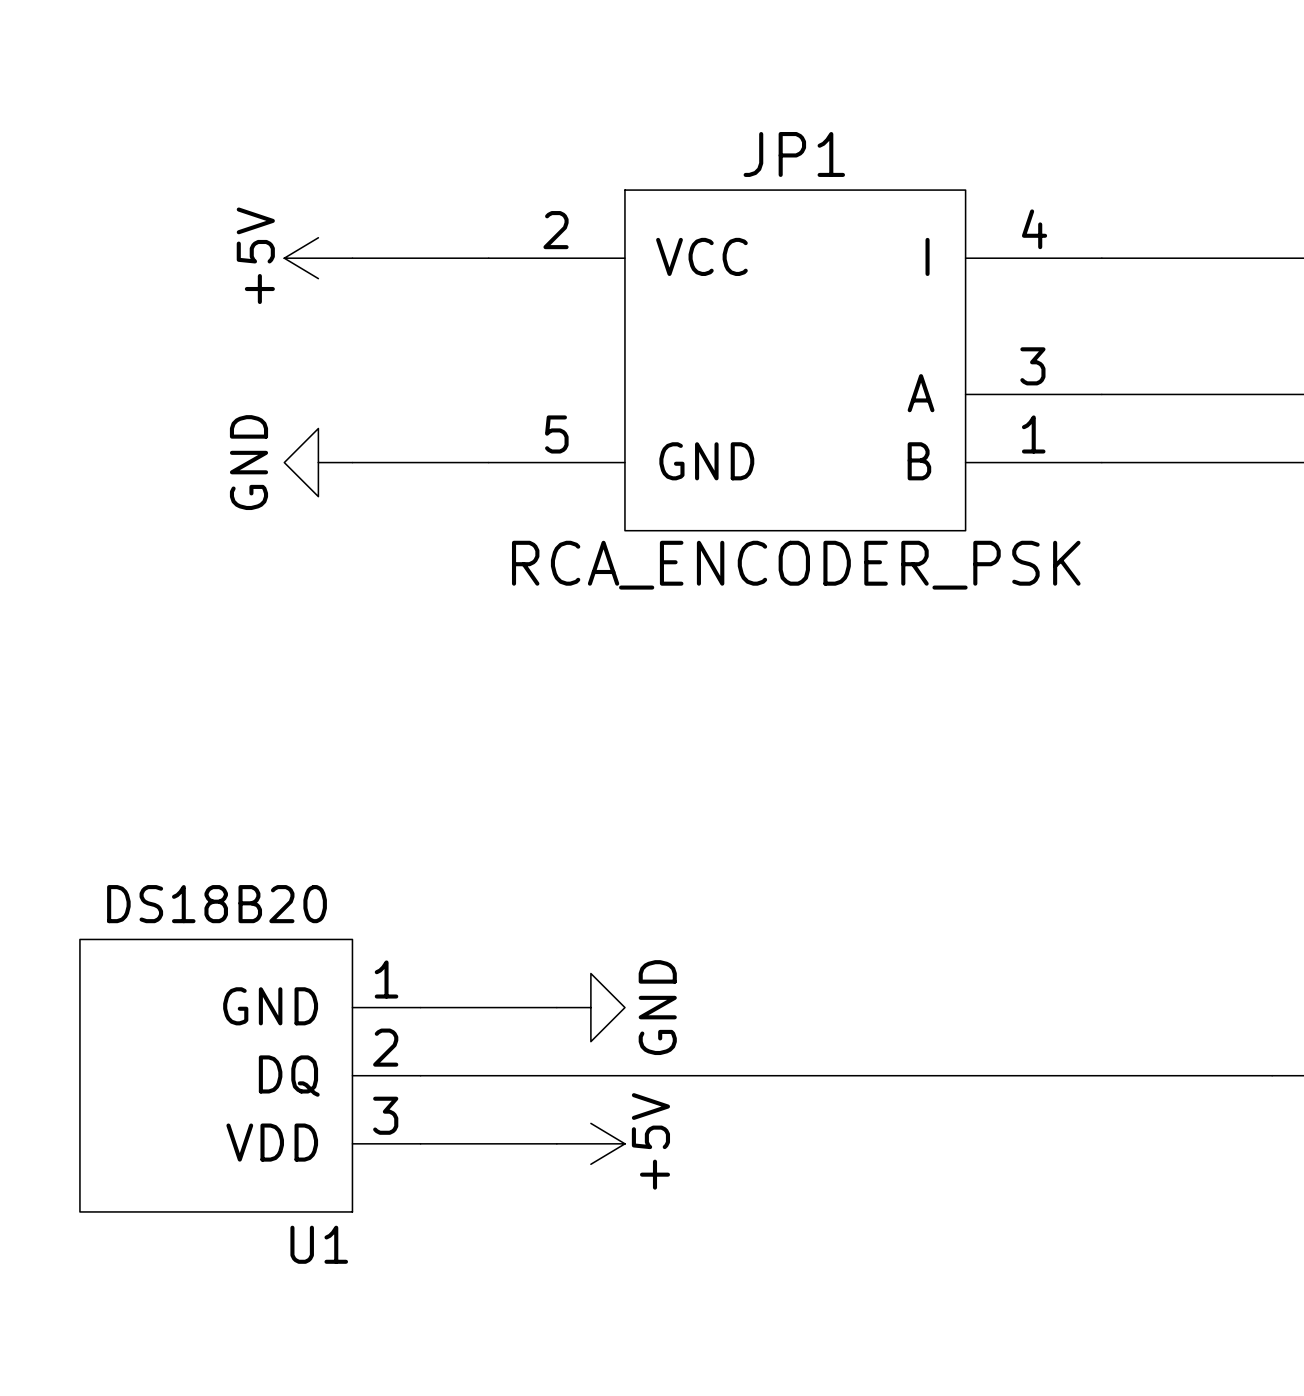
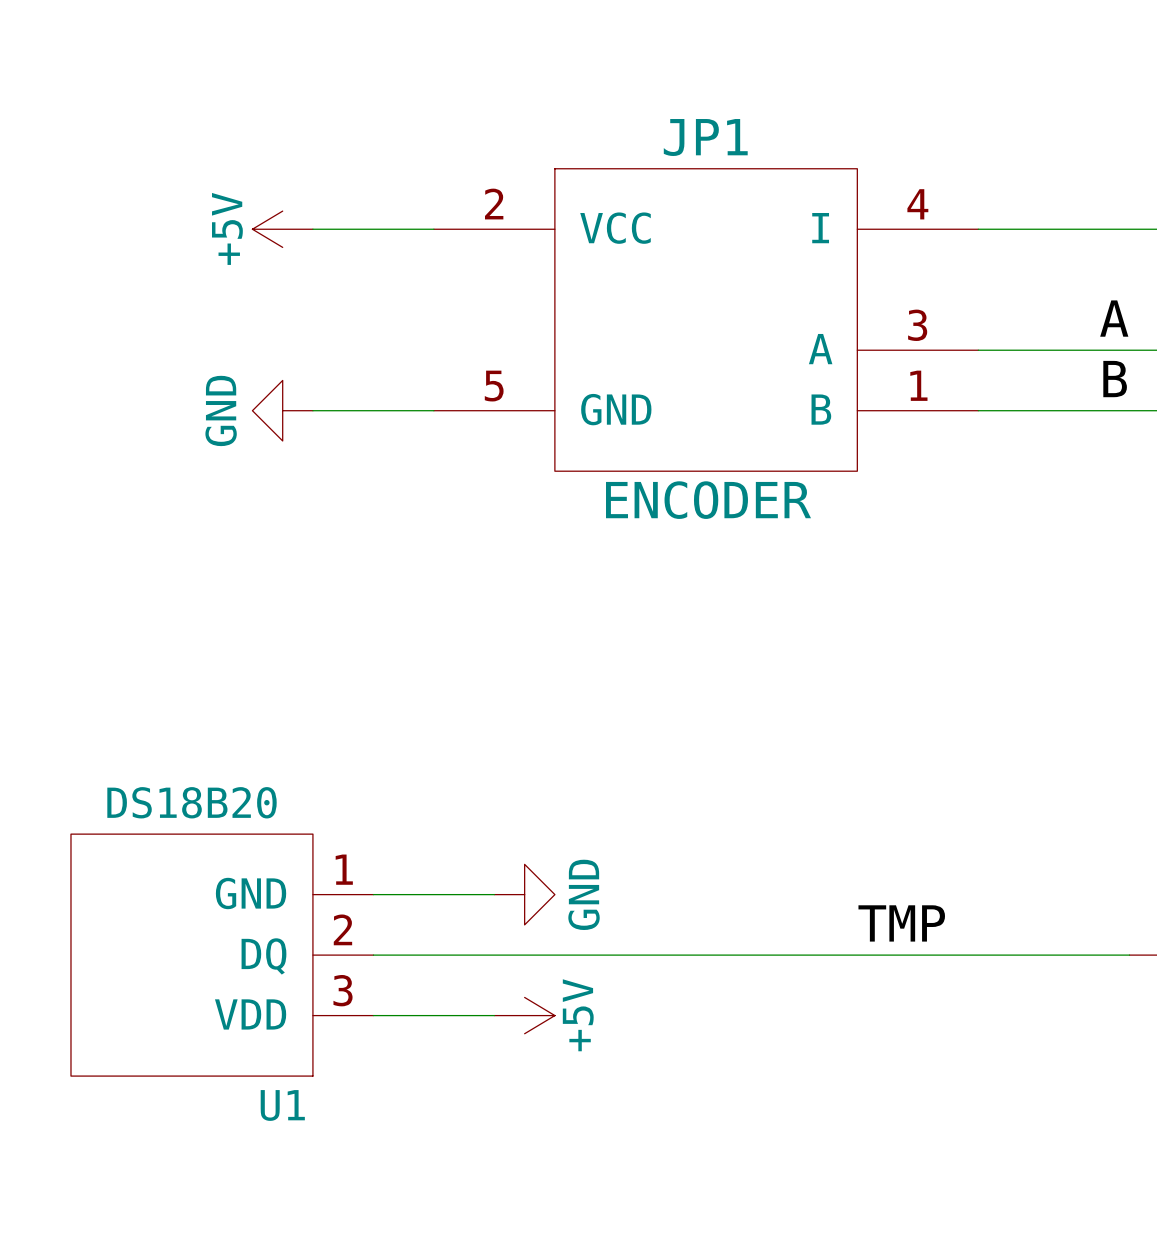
label: none -> A (1114, 318)
label: none -> B (1115, 379)
JP1 value: RCA_ENCODER_PSK (796, 565) -> ENCODER (708, 500)
label: none -> TMP (901, 923)

